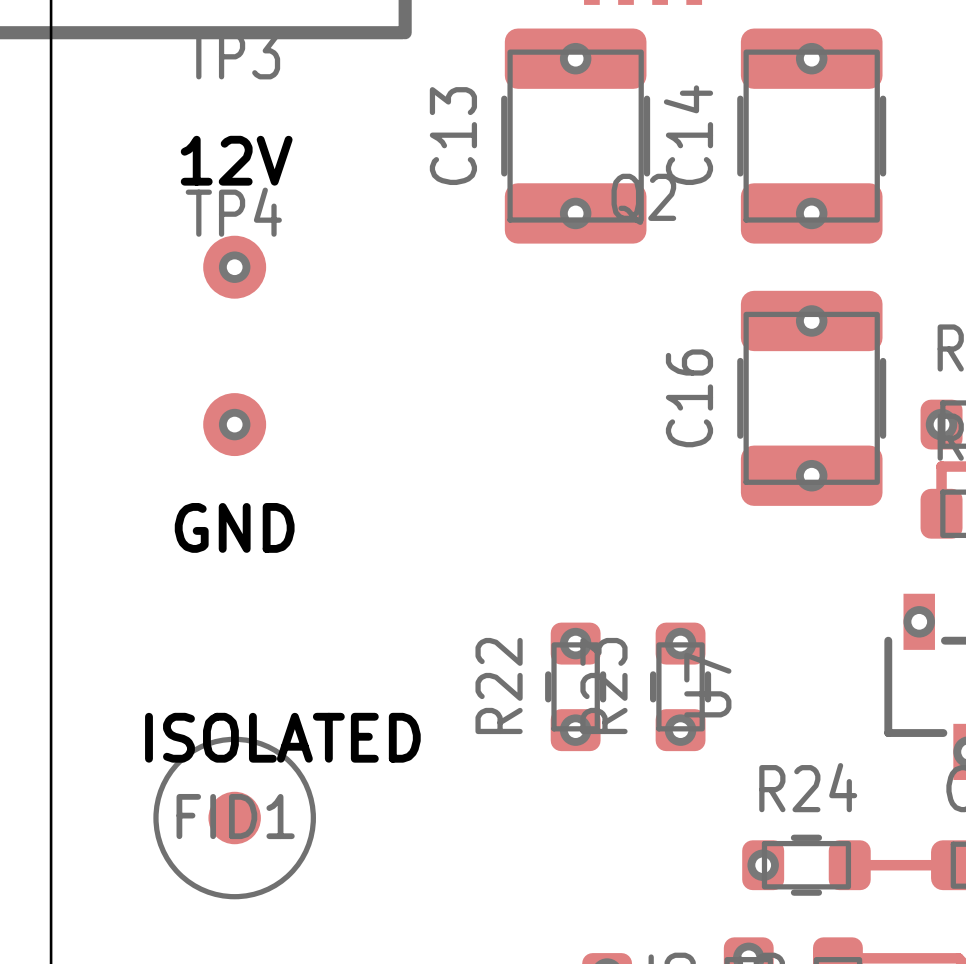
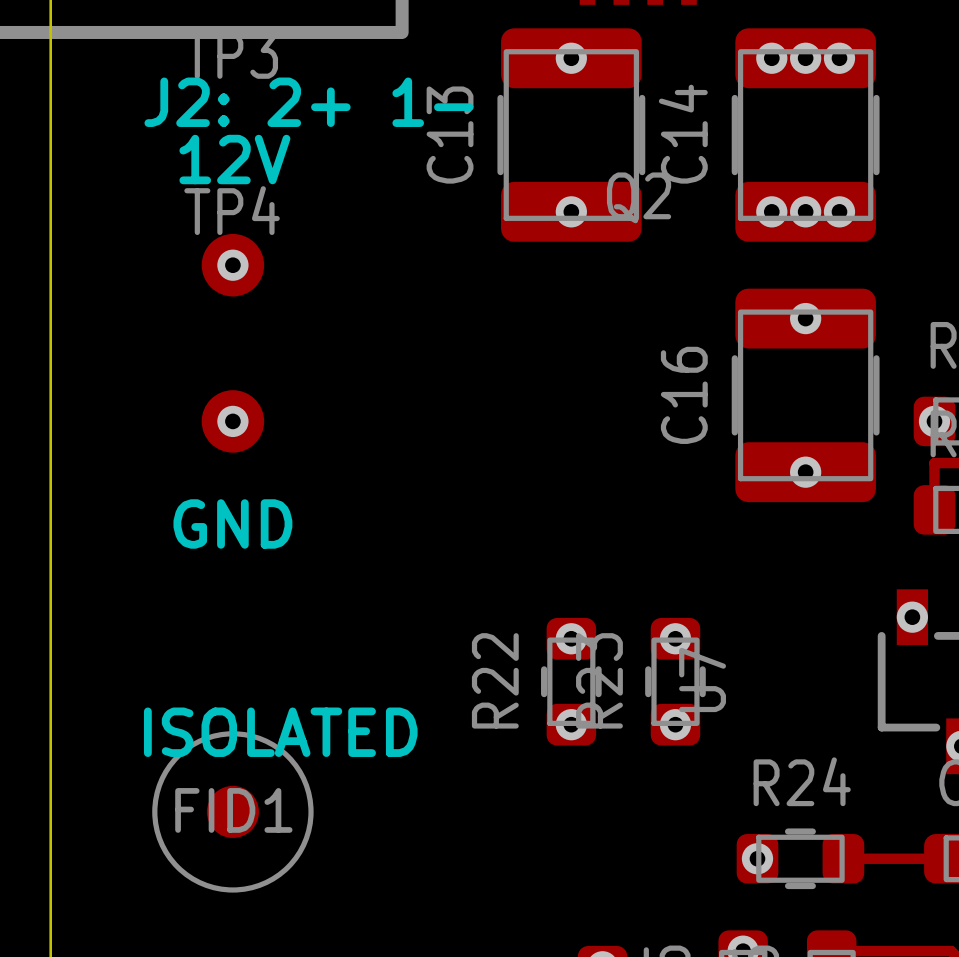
via: none -> (771, 58)
via: none -> (839, 58)
text: none -> J2: 2+ 1- (309, 102)
via: none -> (771, 211)
via: none -> (839, 211)

